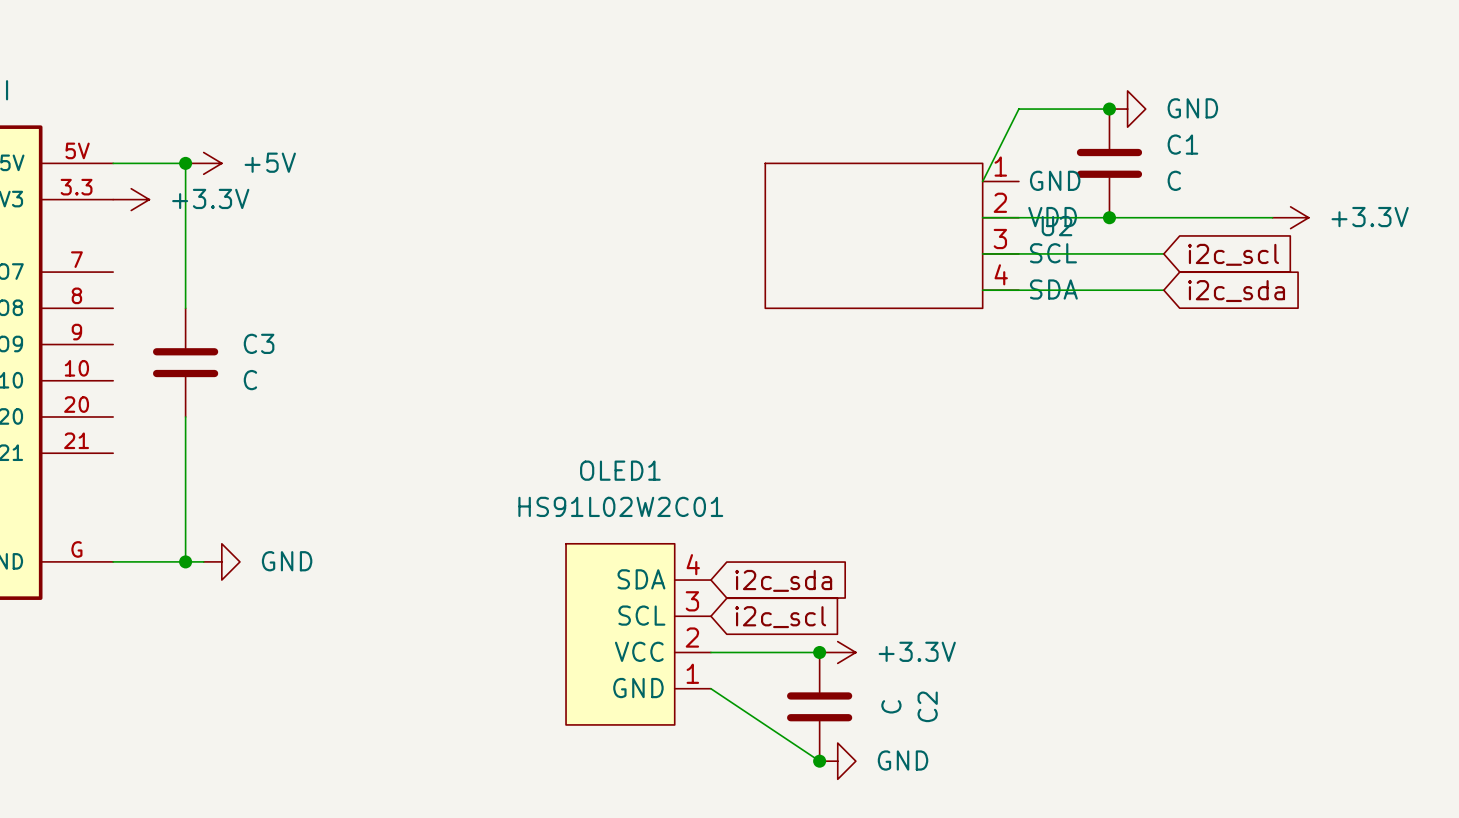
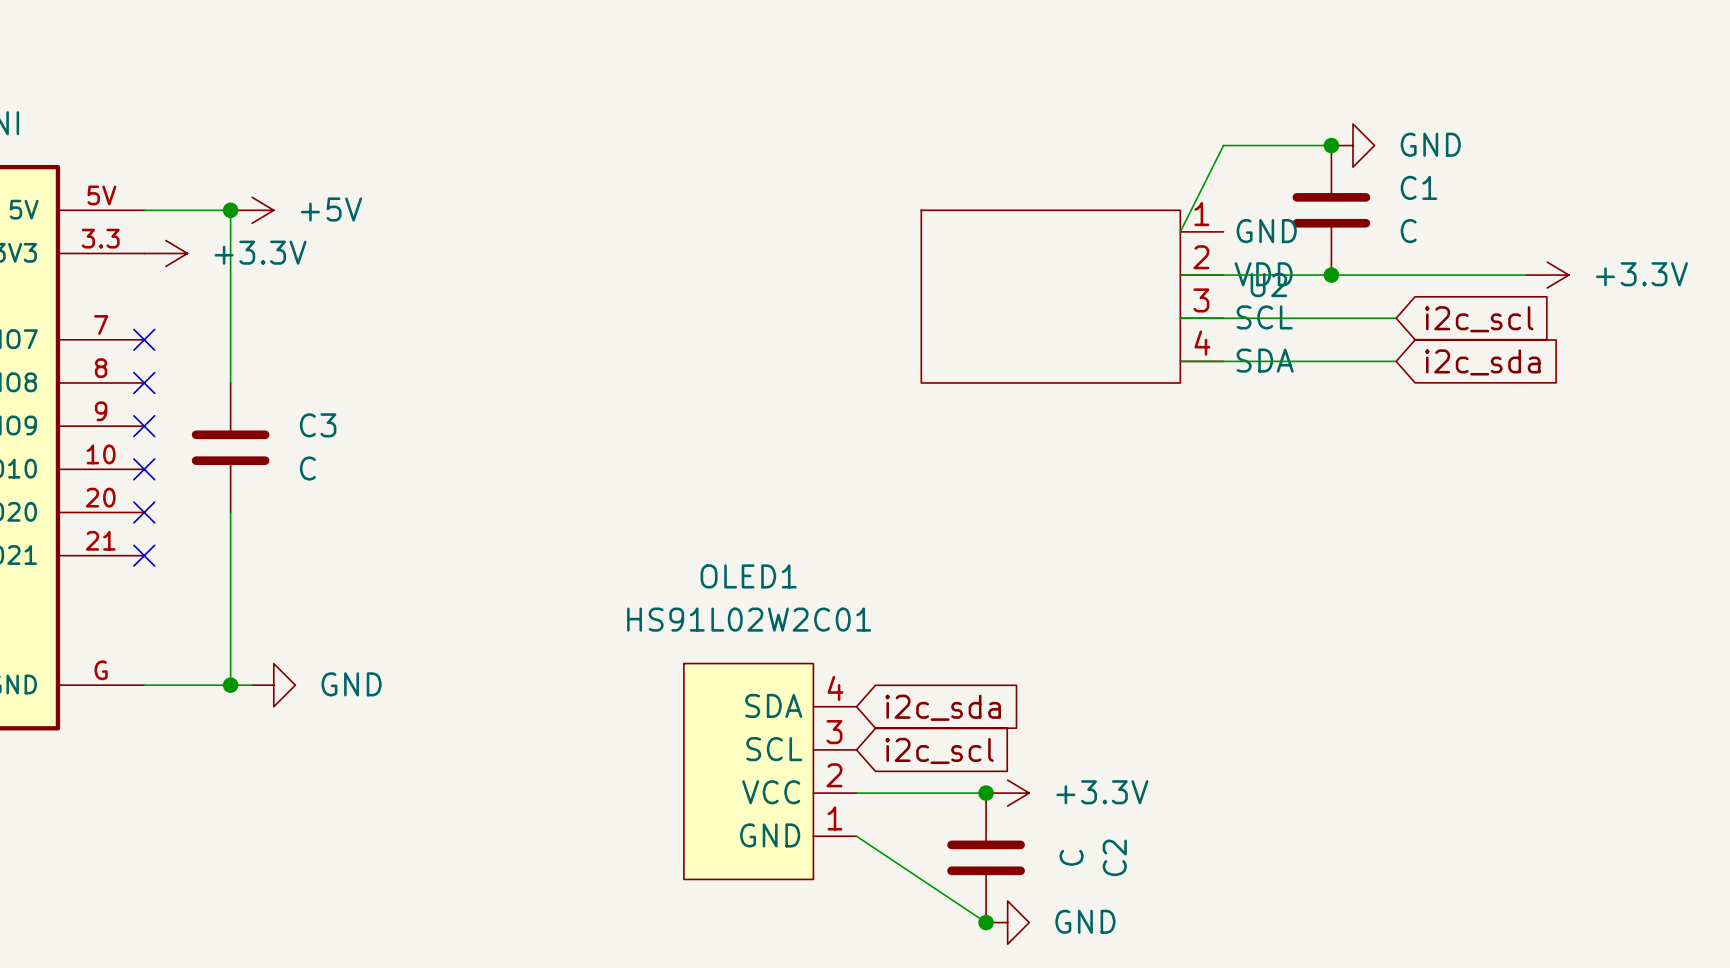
no-connect mark: none -> (144, 339)
no-connect mark: none -> (144, 382)
no-connect mark: none -> (144, 426)
no-connect mark: none -> (144, 469)
no-connect mark: none -> (144, 512)
no-connect mark: none -> (144, 555)

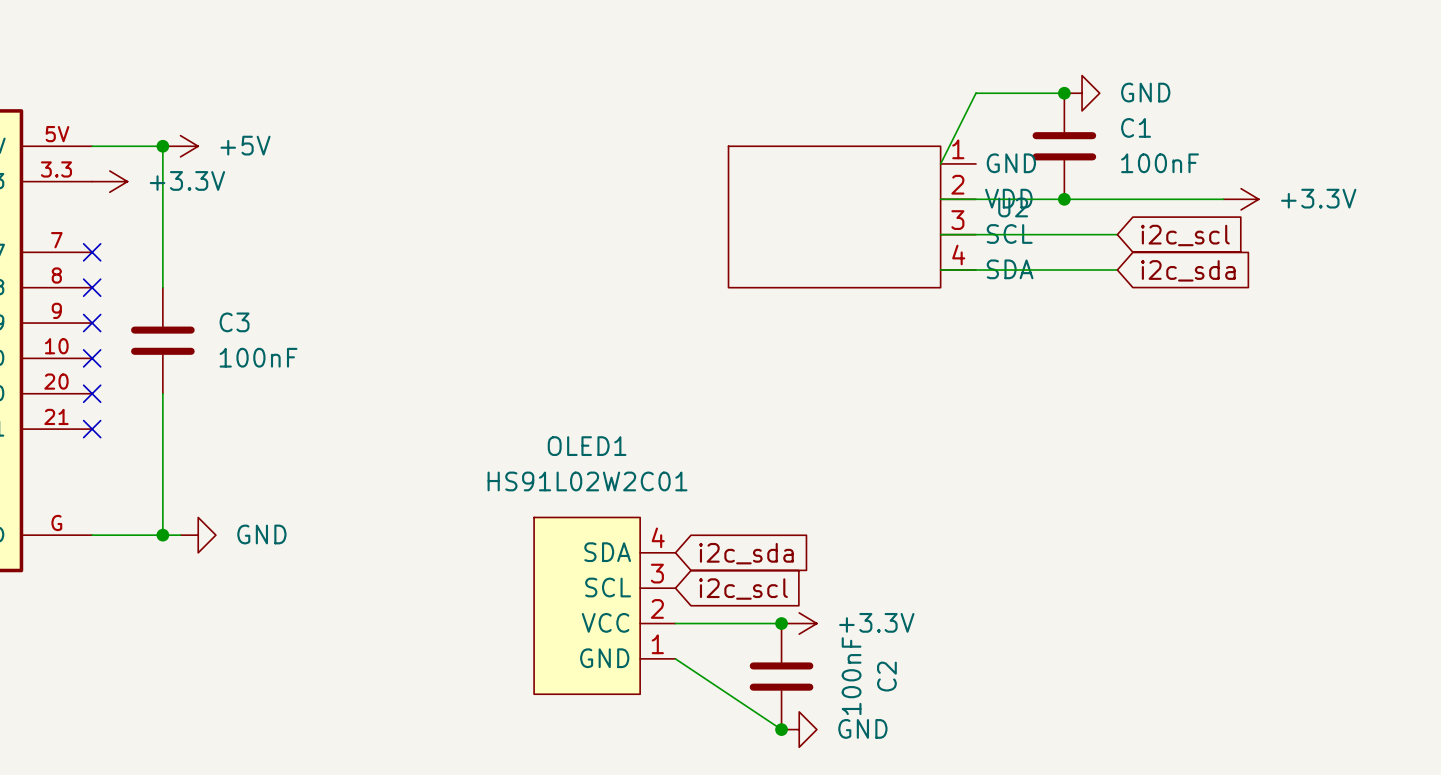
C1 value: C (1408, 231) -> 100nF (1160, 163)
C3 value: C (307, 468) -> 100nF (258, 357)
C2 value: C (1071, 857) -> 100nF (851, 676)

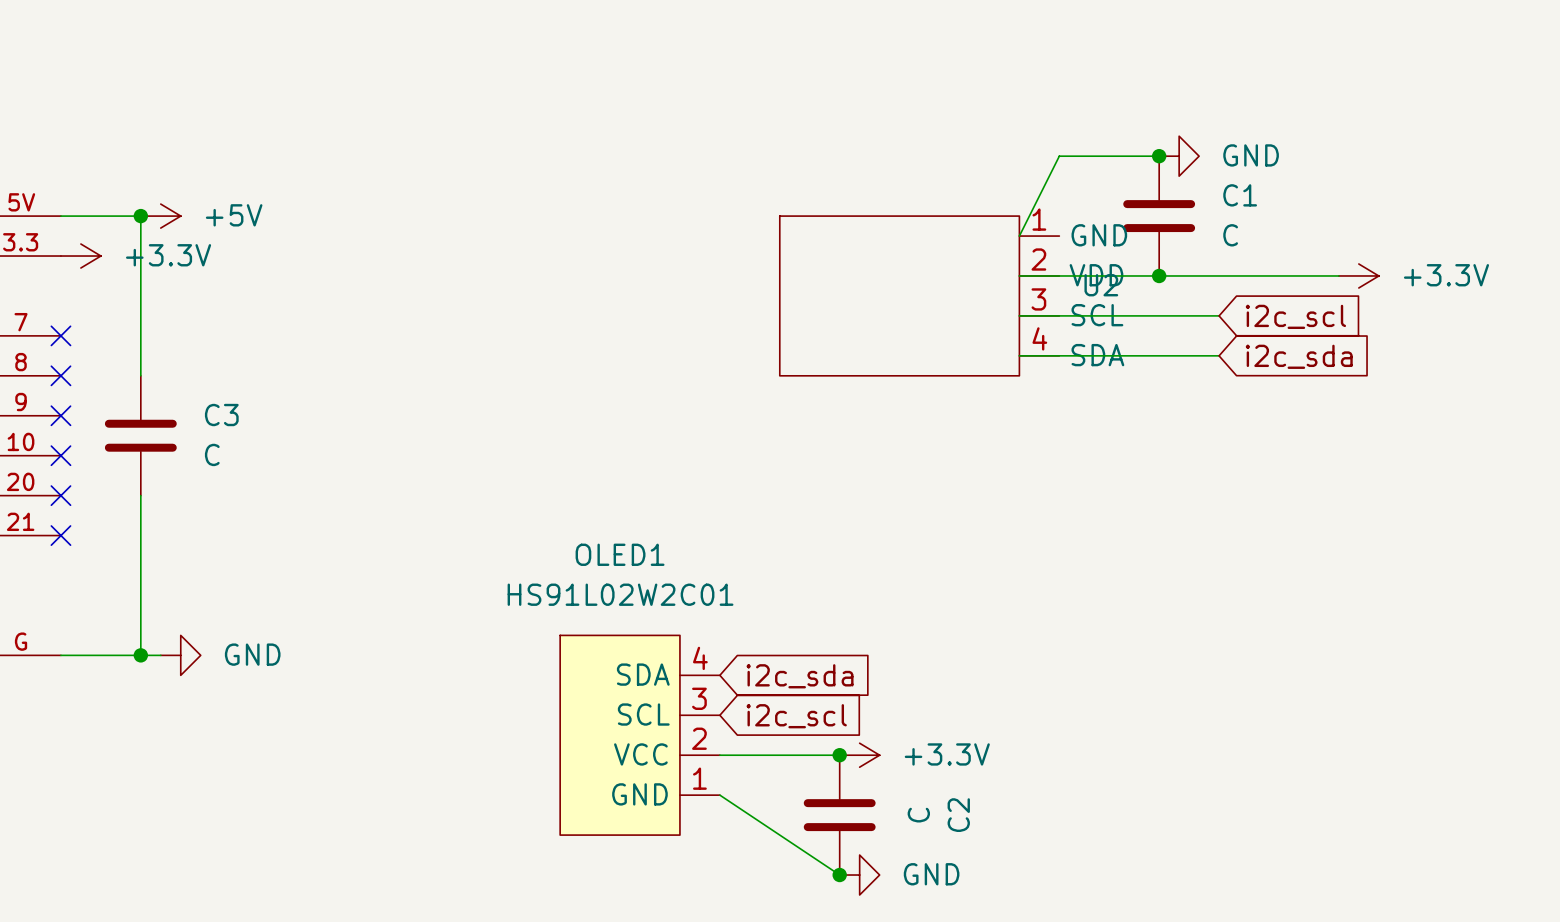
C1 value: 100nF (1160, 163) -> C (1230, 235)
C3 value: 100nF (258, 357) -> C (212, 454)
C2 value: 100nF (851, 676) -> C (918, 815)

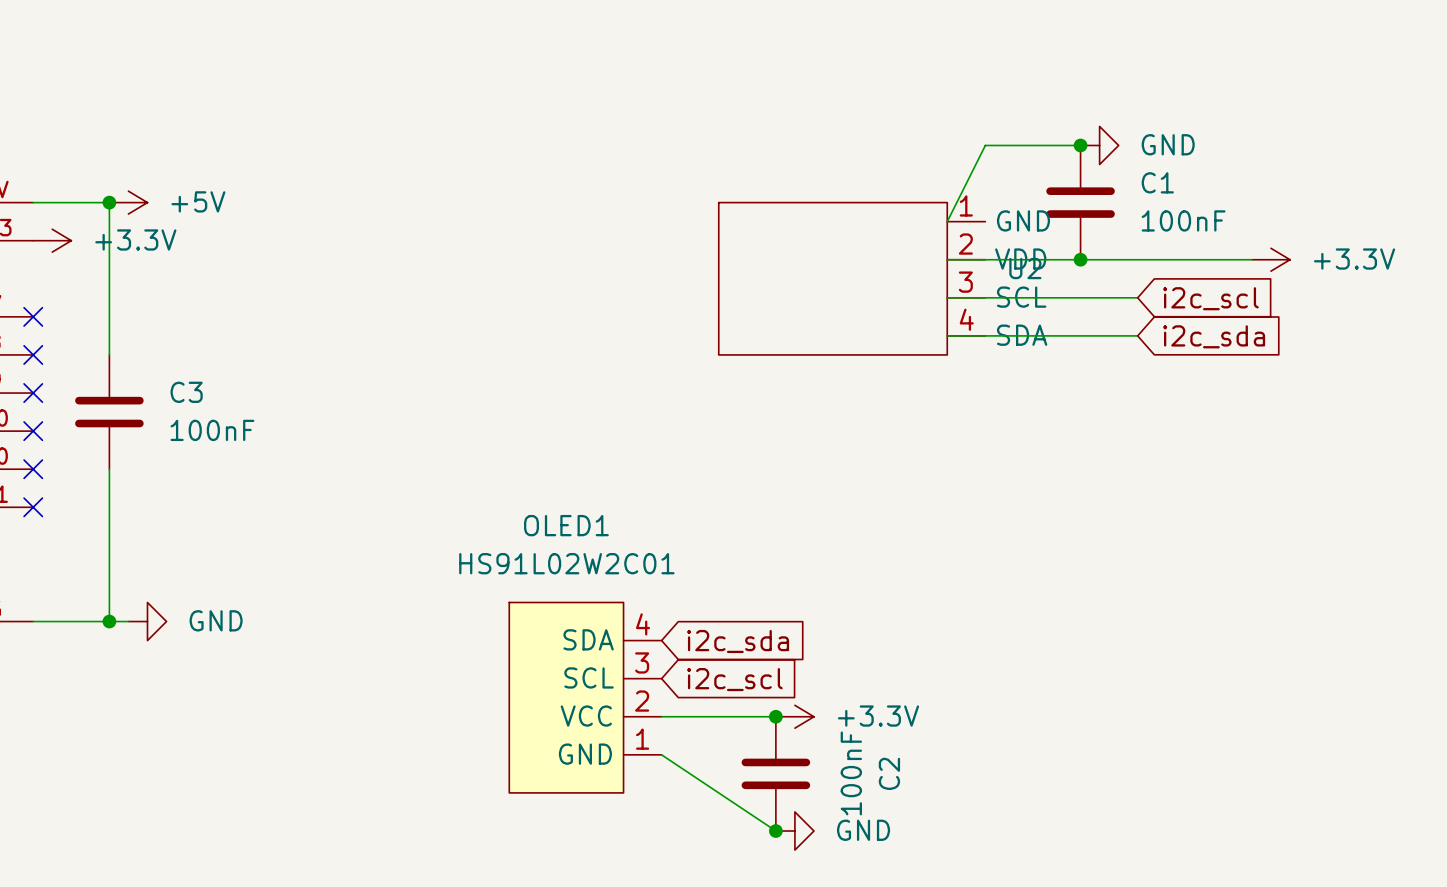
C1 value: C (1230, 235) -> 100nF (1183, 220)
C3 value: C (212, 454) -> 100nF (212, 430)
C2 value: C (918, 815) -> 100nF (851, 773)

